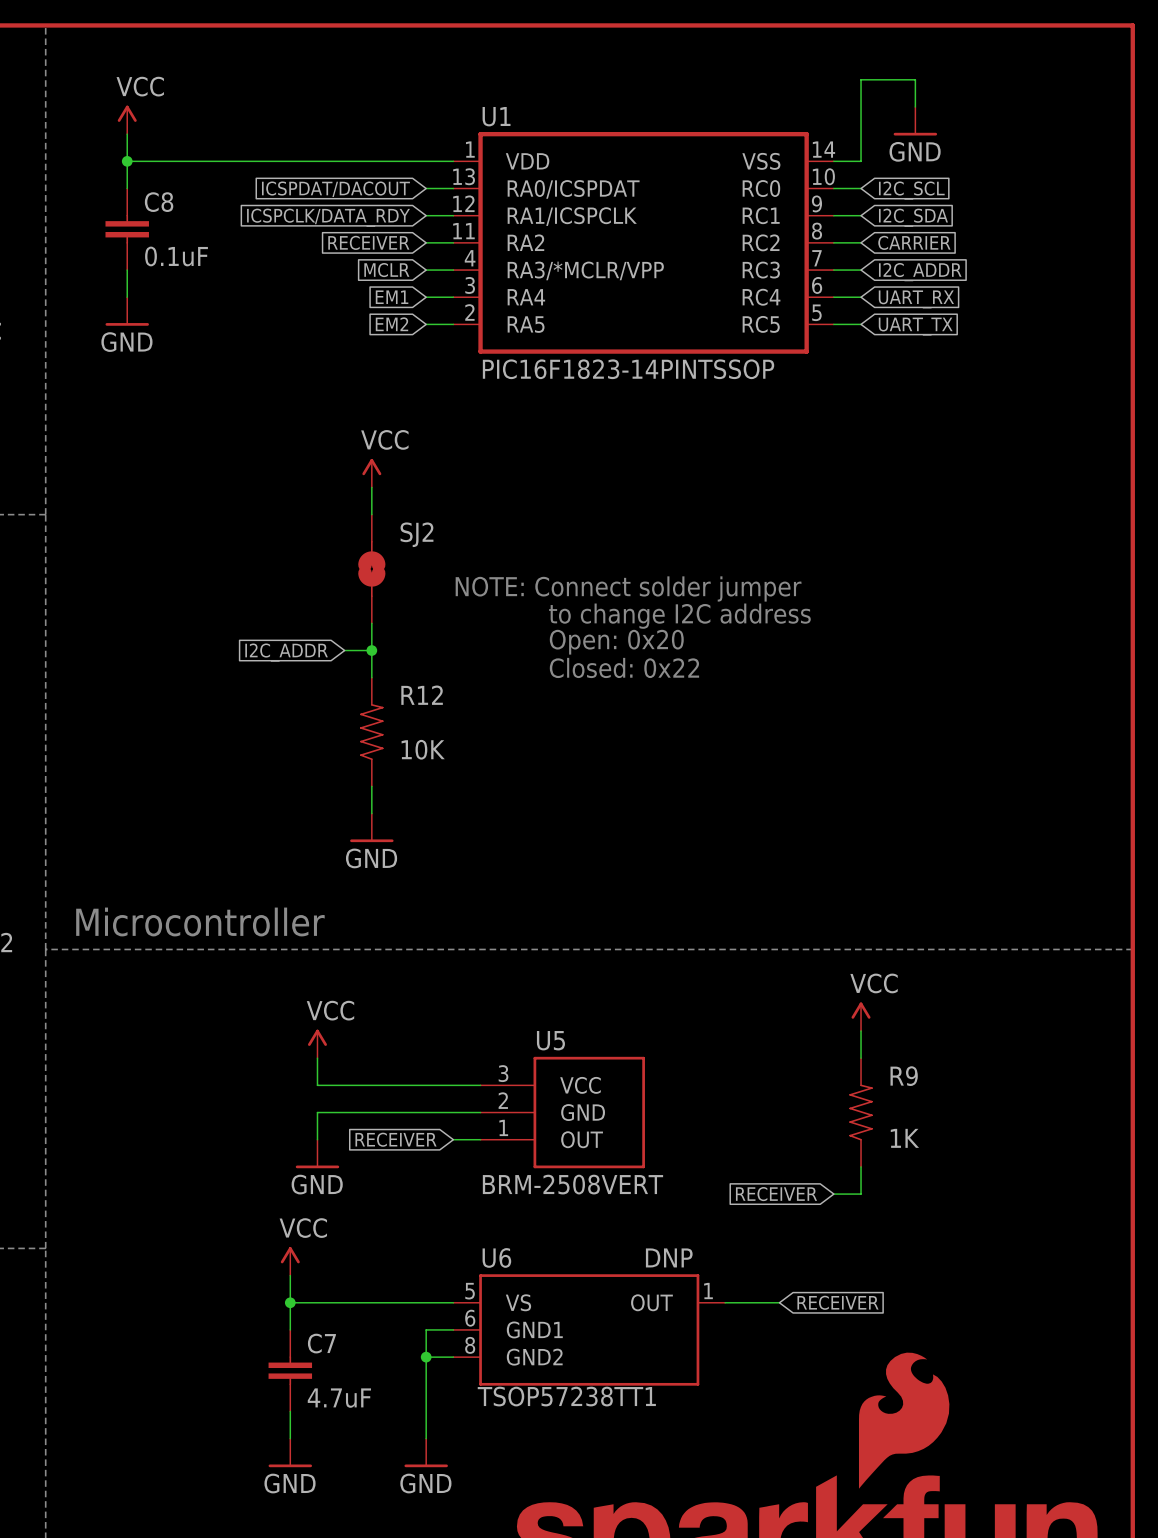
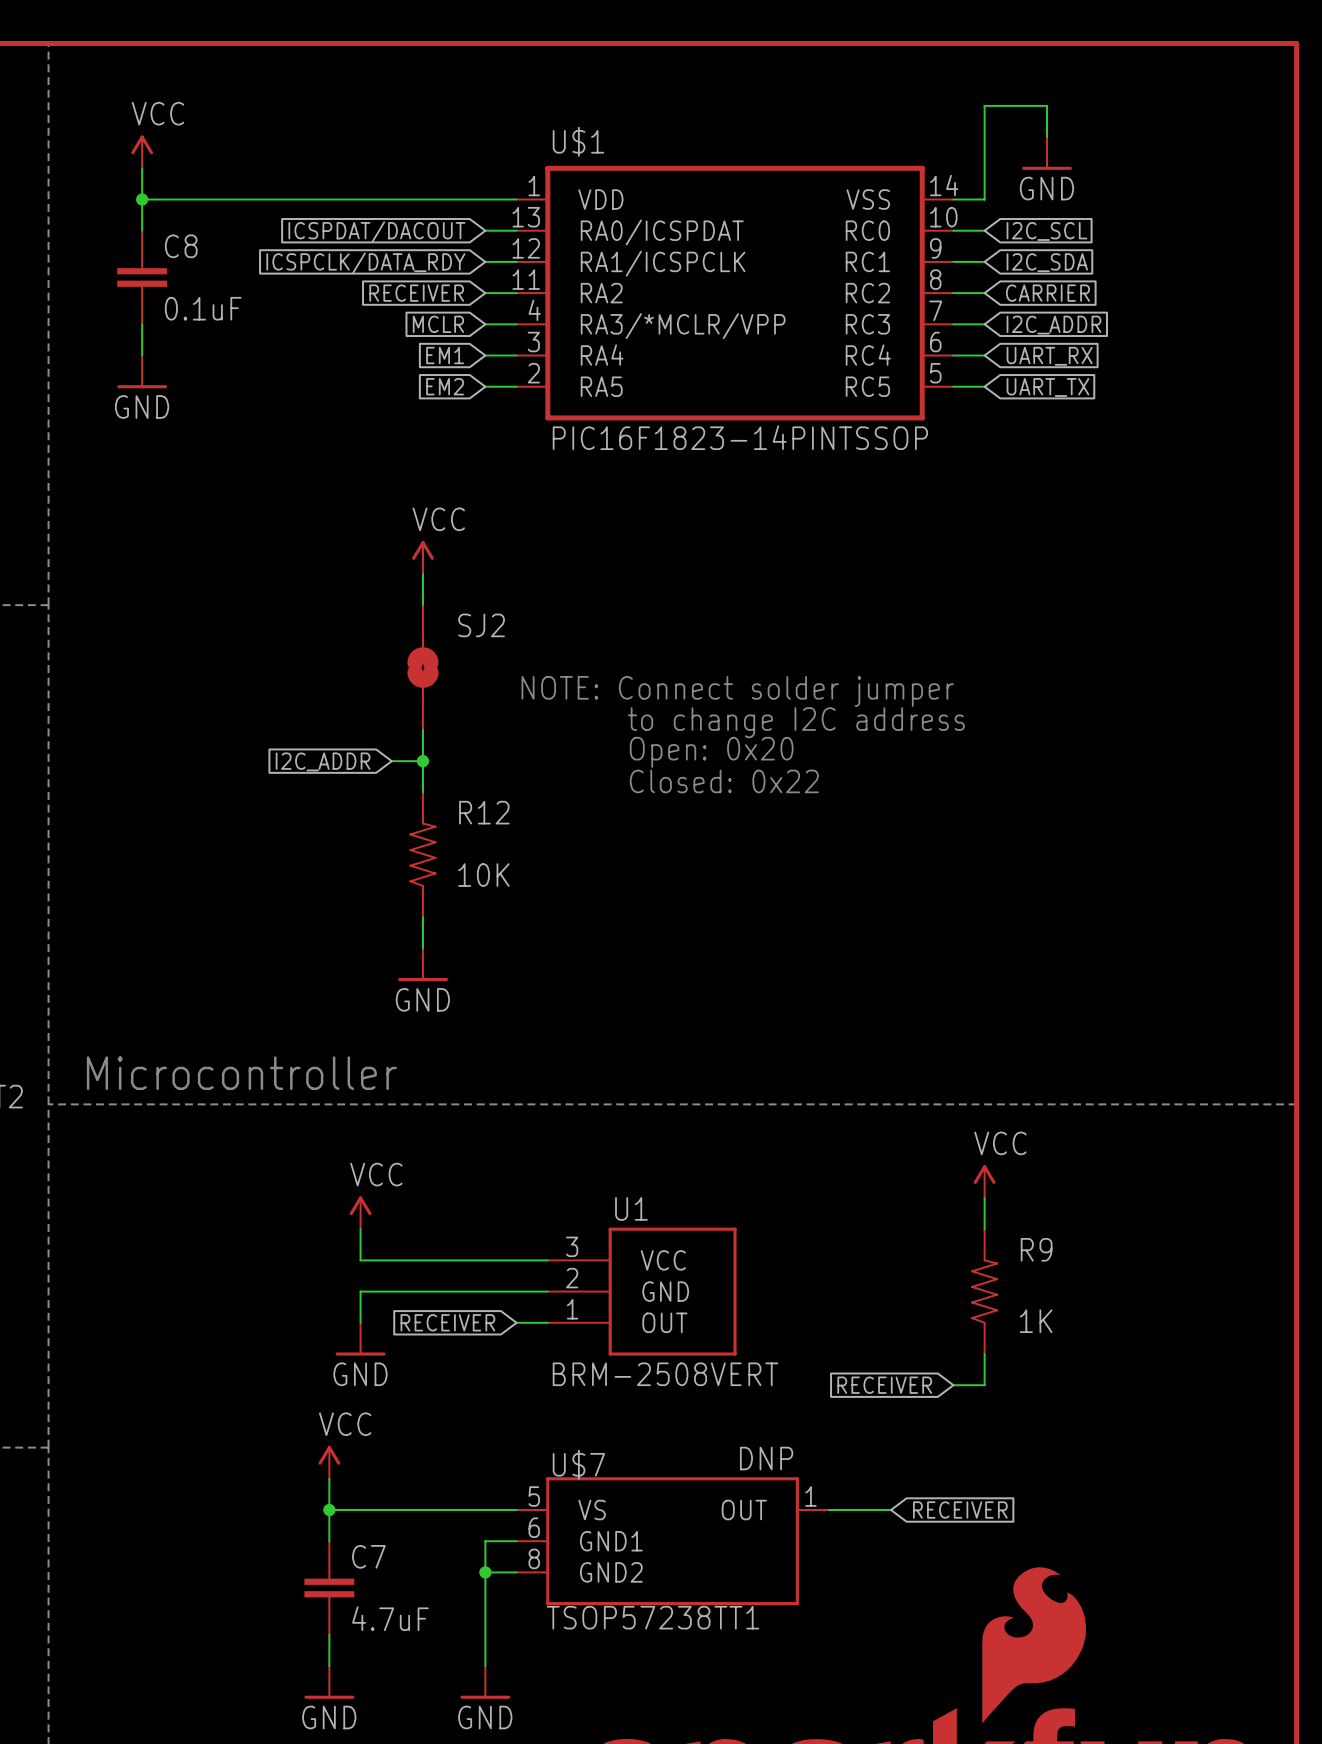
U1 name: U1 (496, 116) -> U$1 (578, 141)
U5 name: U5 (550, 1040) -> U1 (631, 1208)
U6 name: U6 (496, 1257) -> U$7 (578, 1464)

